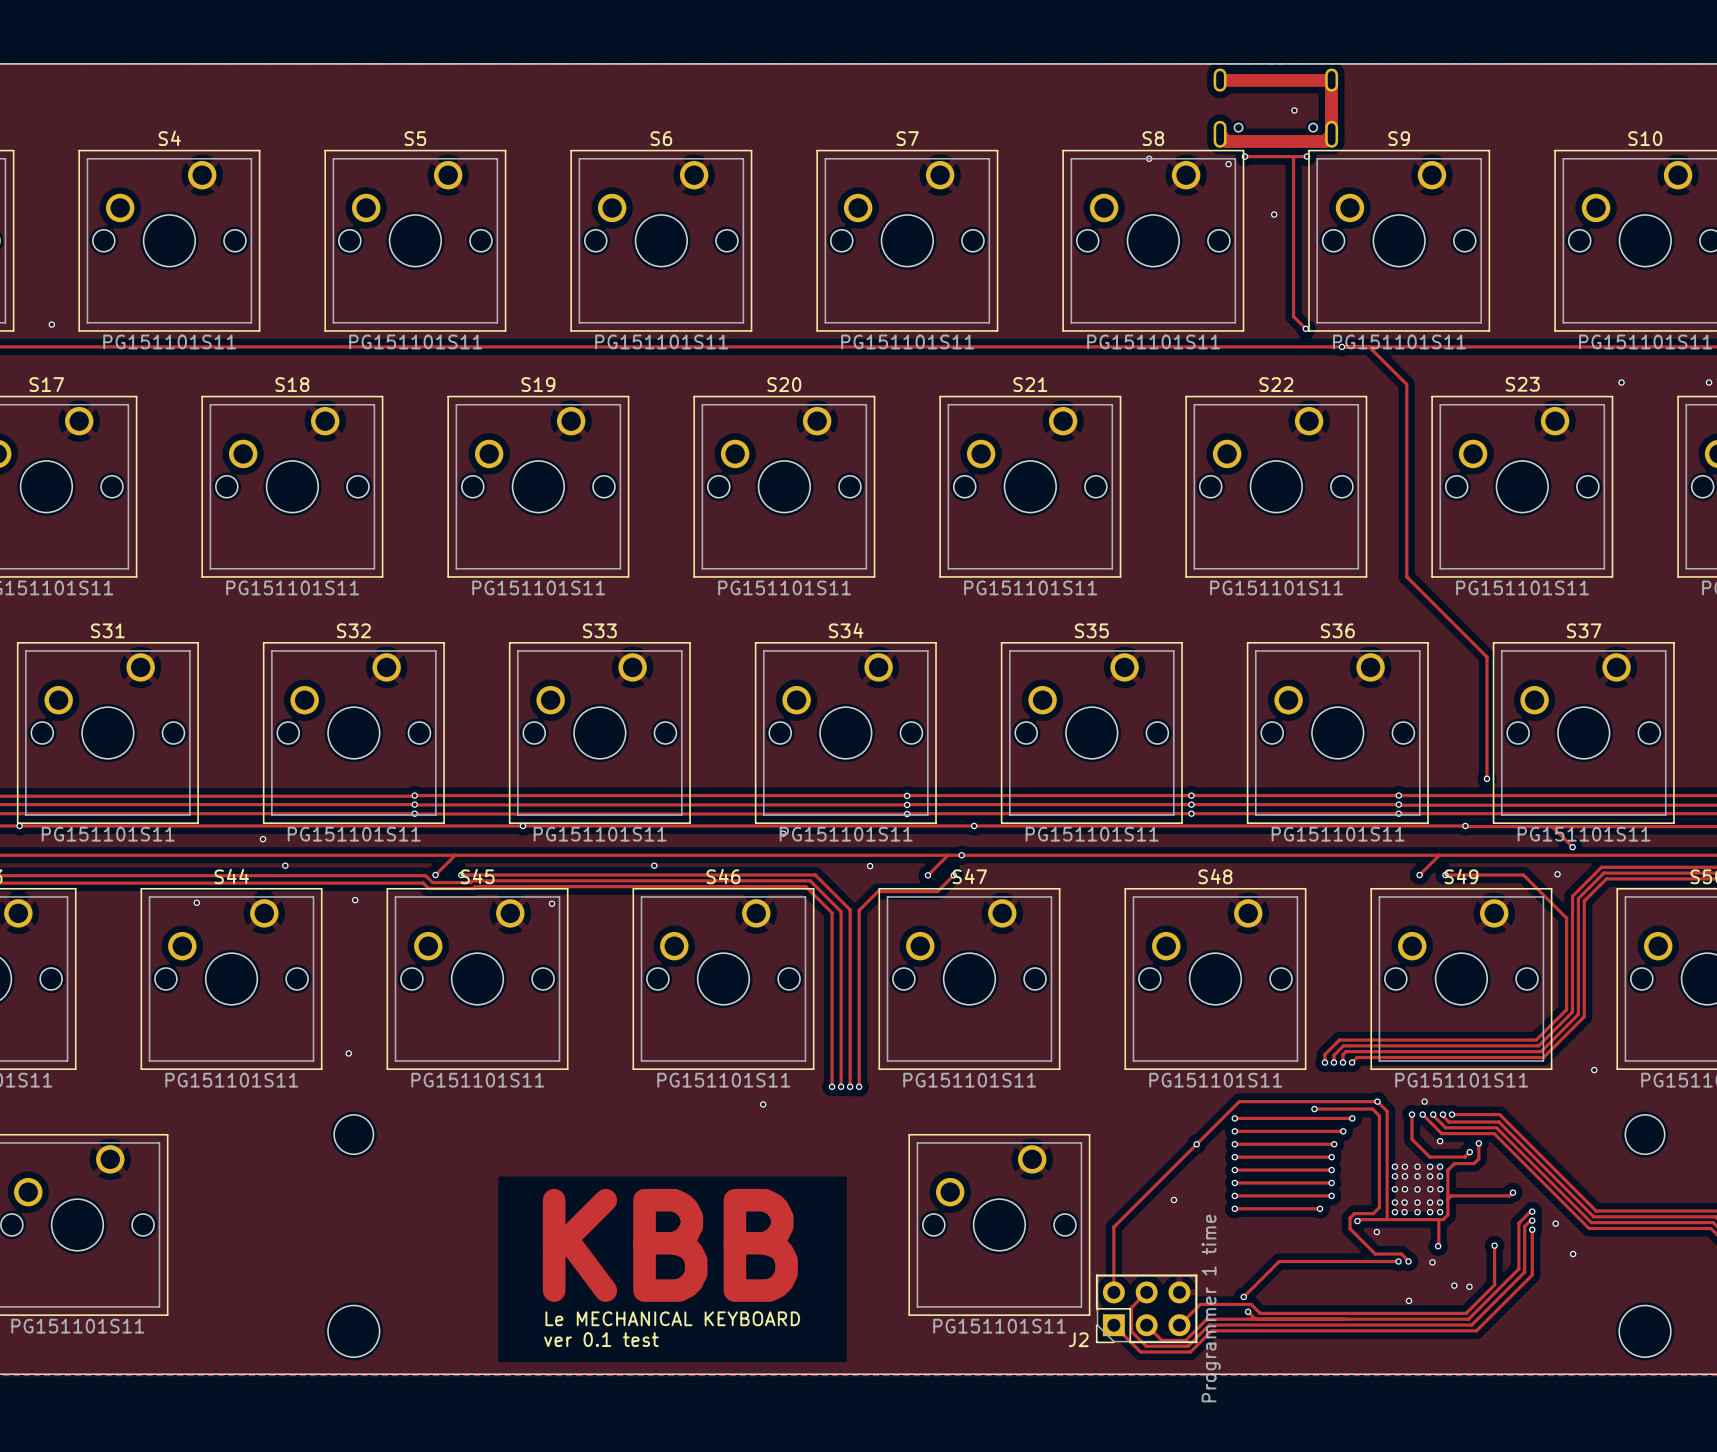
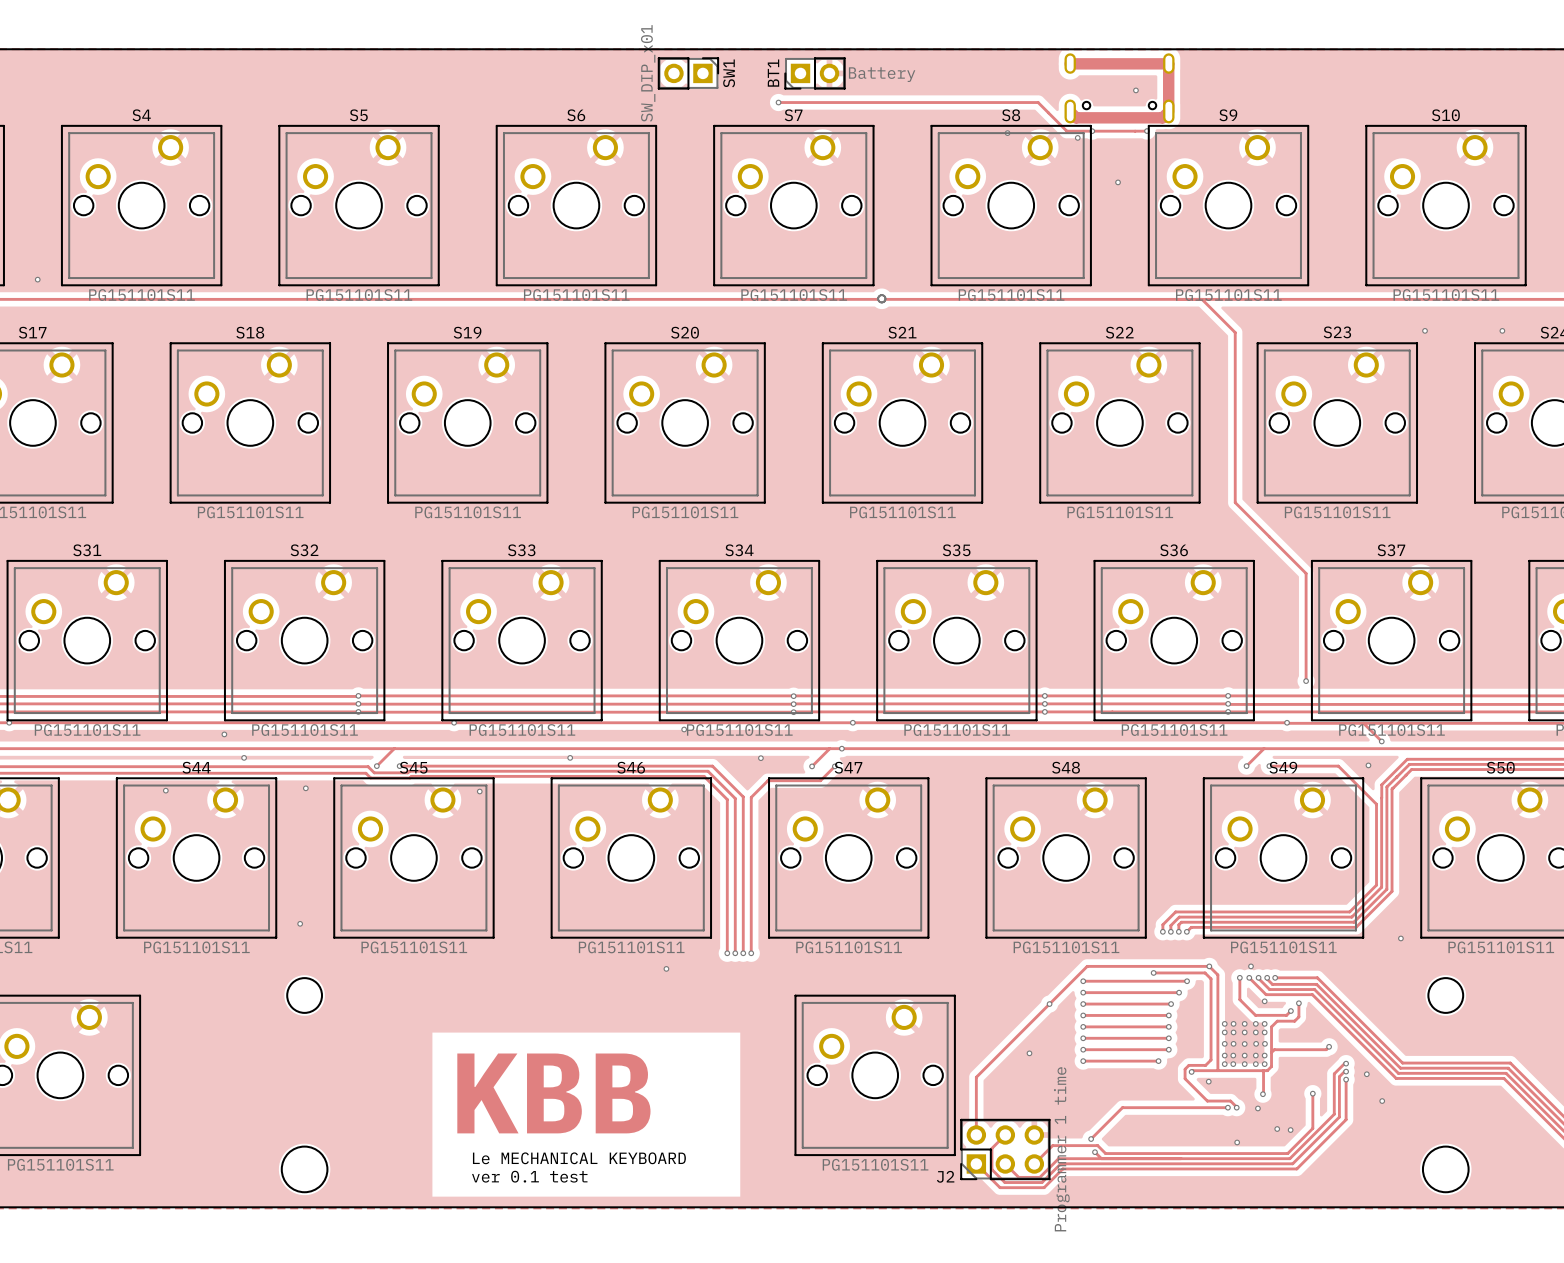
SW1: none -> SW_DIP_x01 (688, 73)
BT1: none -> Battery (814, 73)
track: none -> (778, 102) (1038, 102) (1066, 131) (1092, 131)
via: none -> (778, 102)
track: (1293, 156) (1293, 316) (1305, 328) -> none
via: (1305, 328) -> none
via: none -> (881, 298)
via: (1341, 346) -> none

